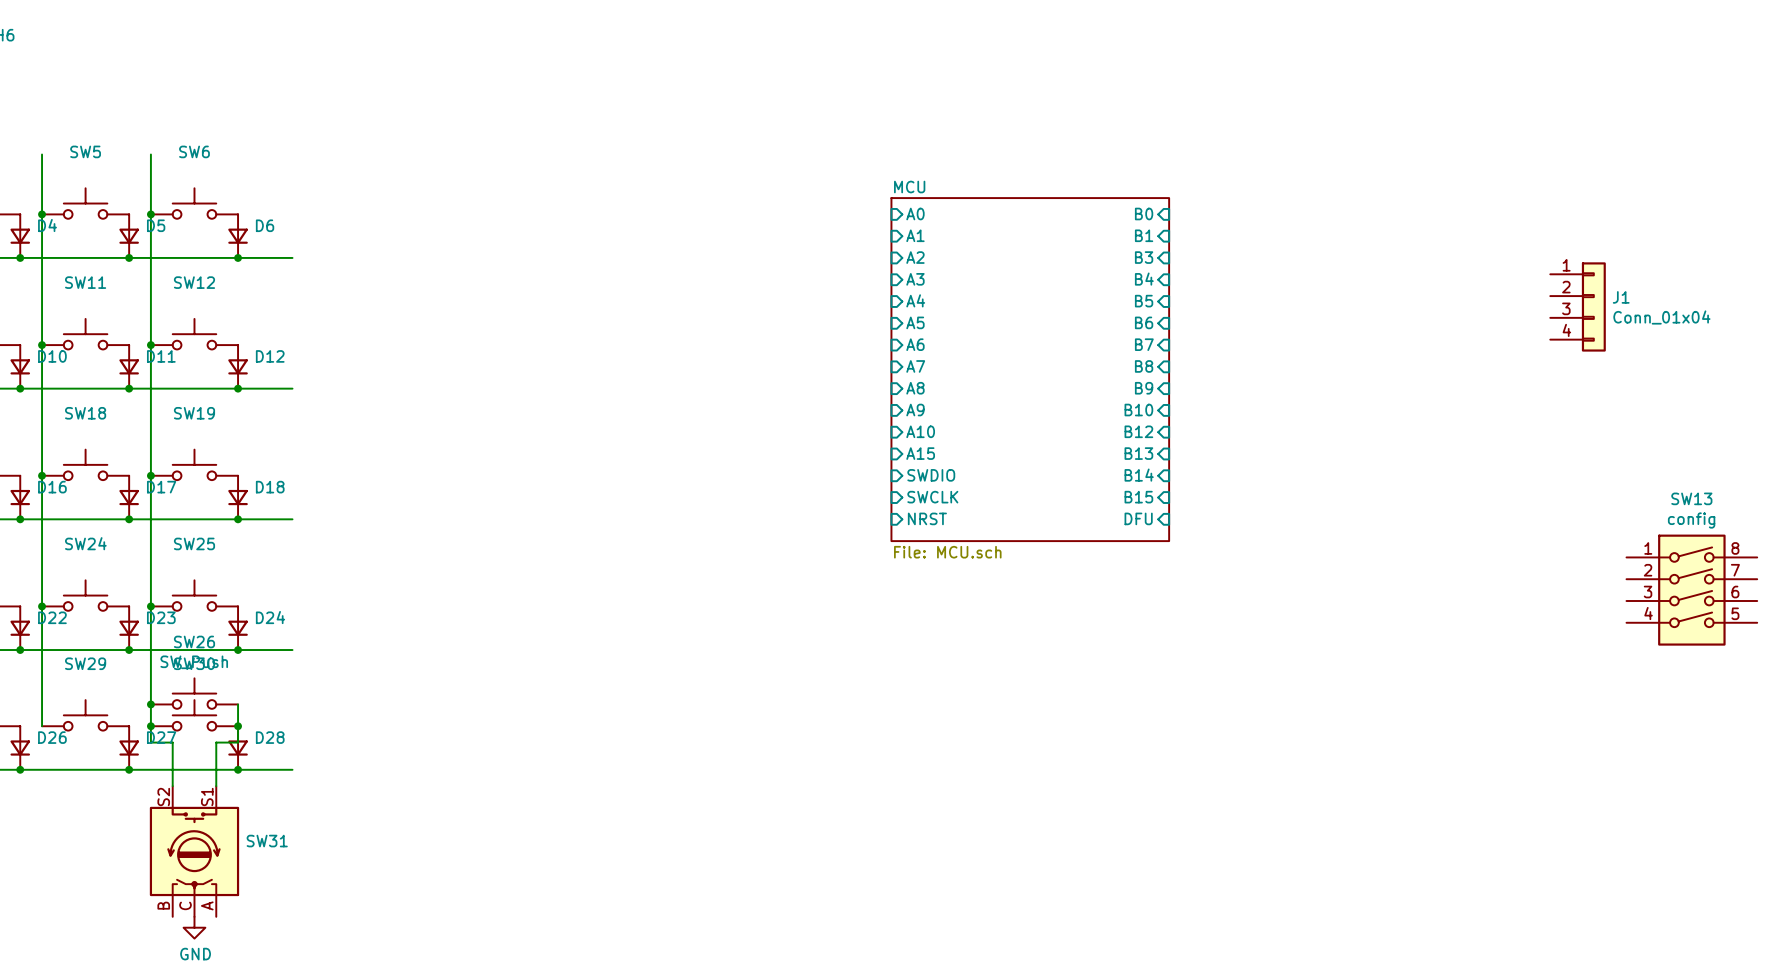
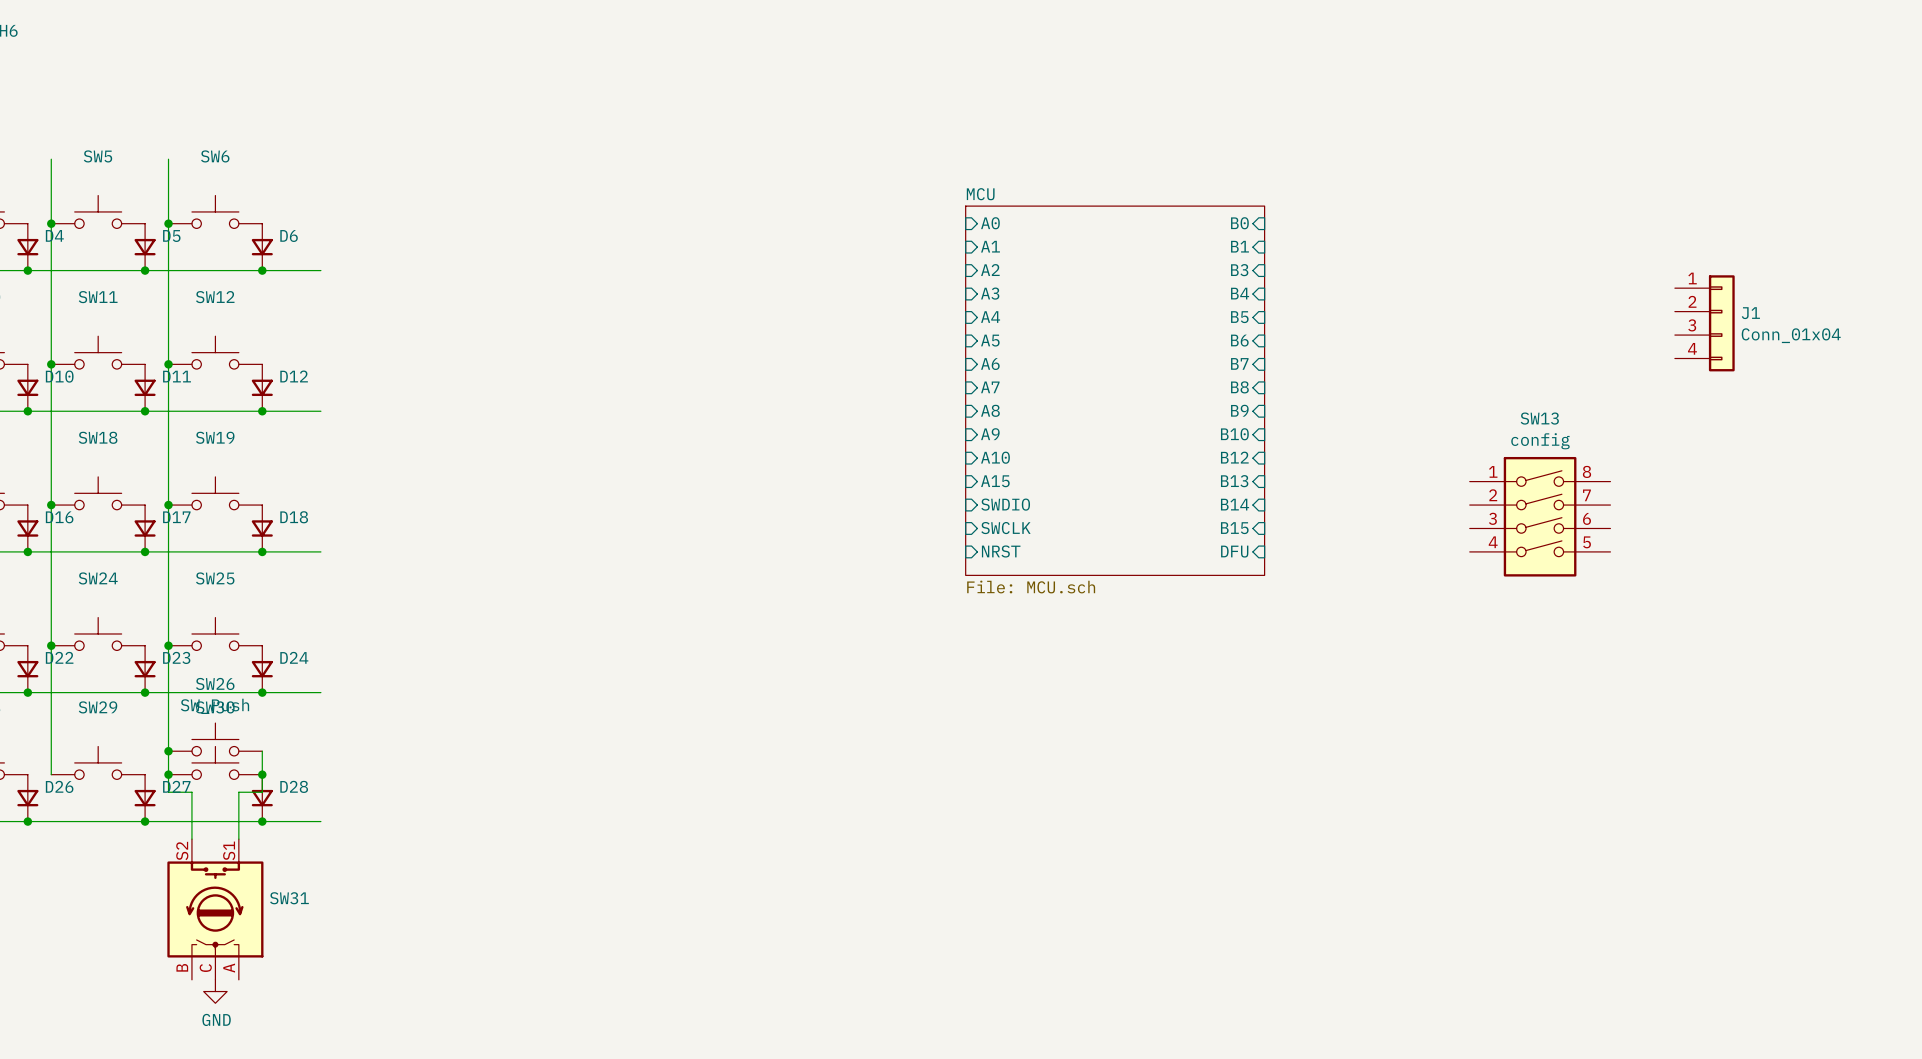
SW13 position: (1691, 590) -> (1540, 516)

